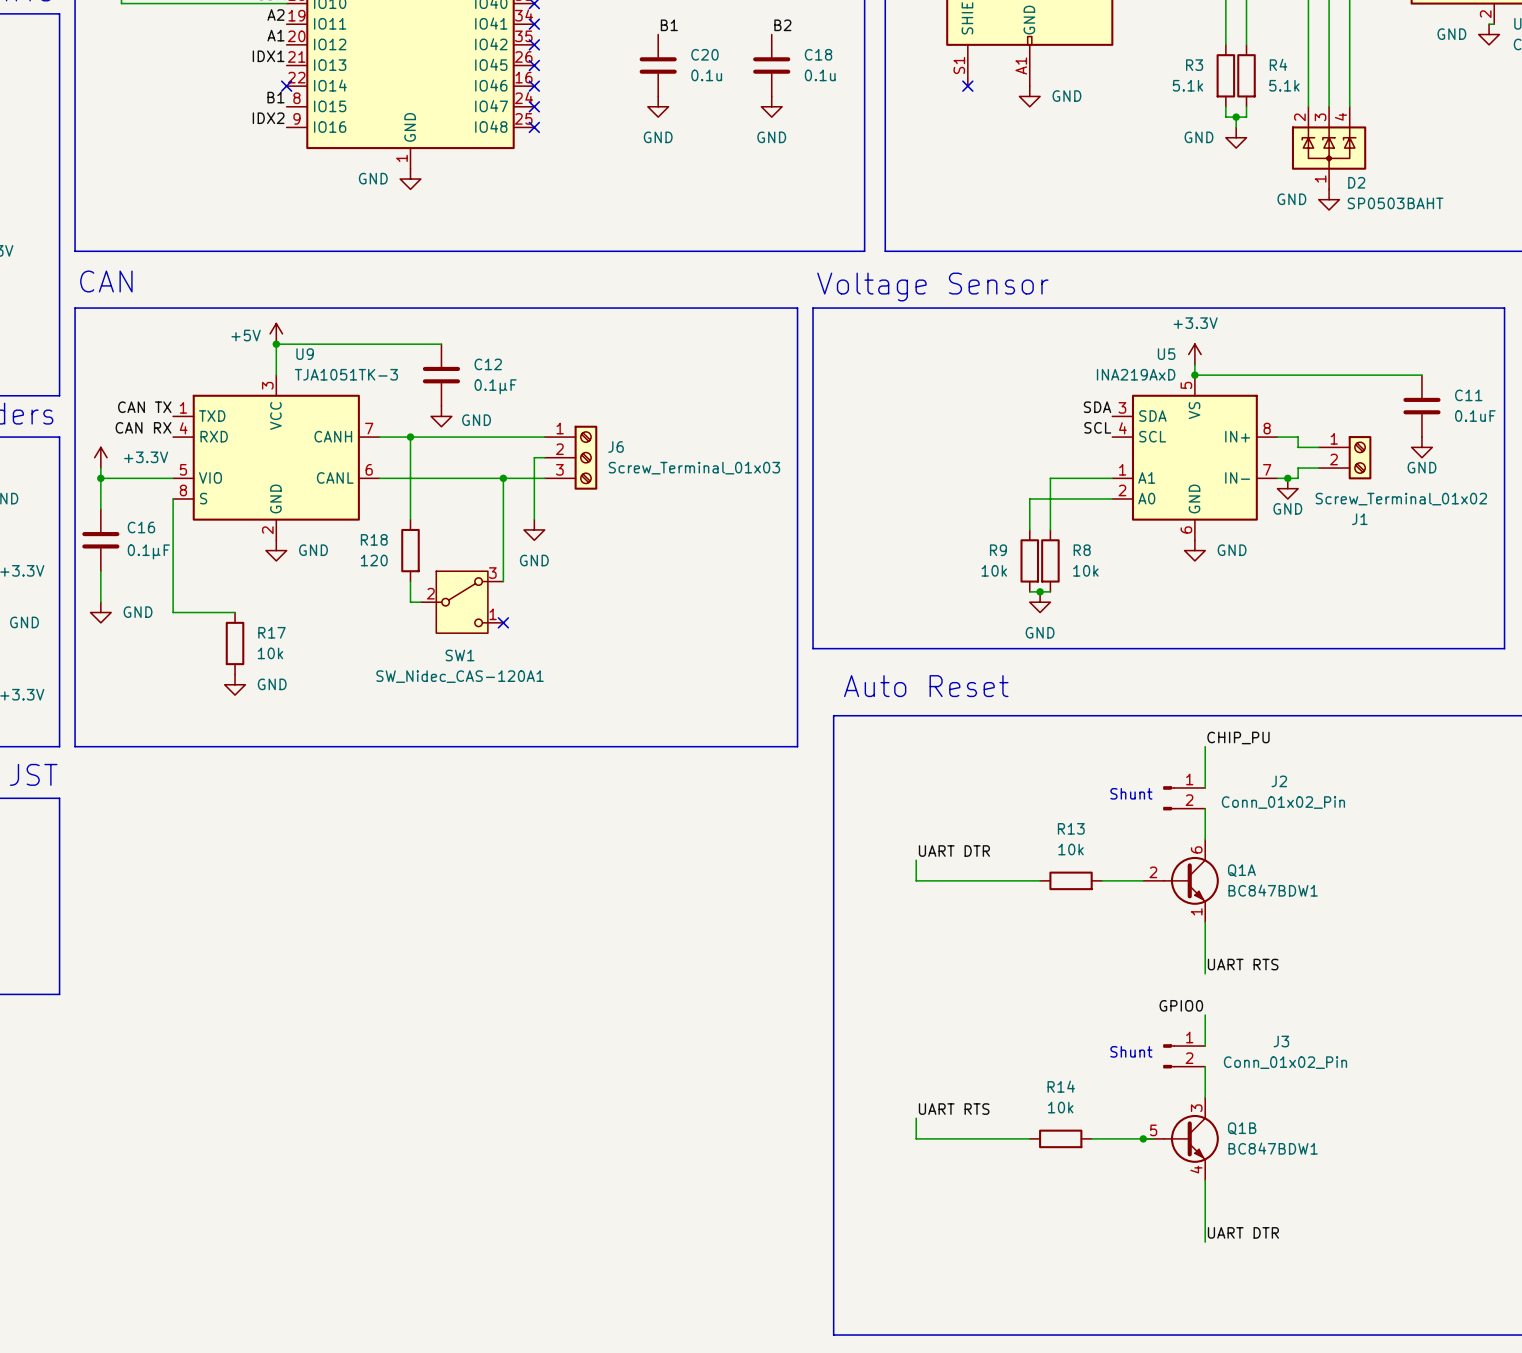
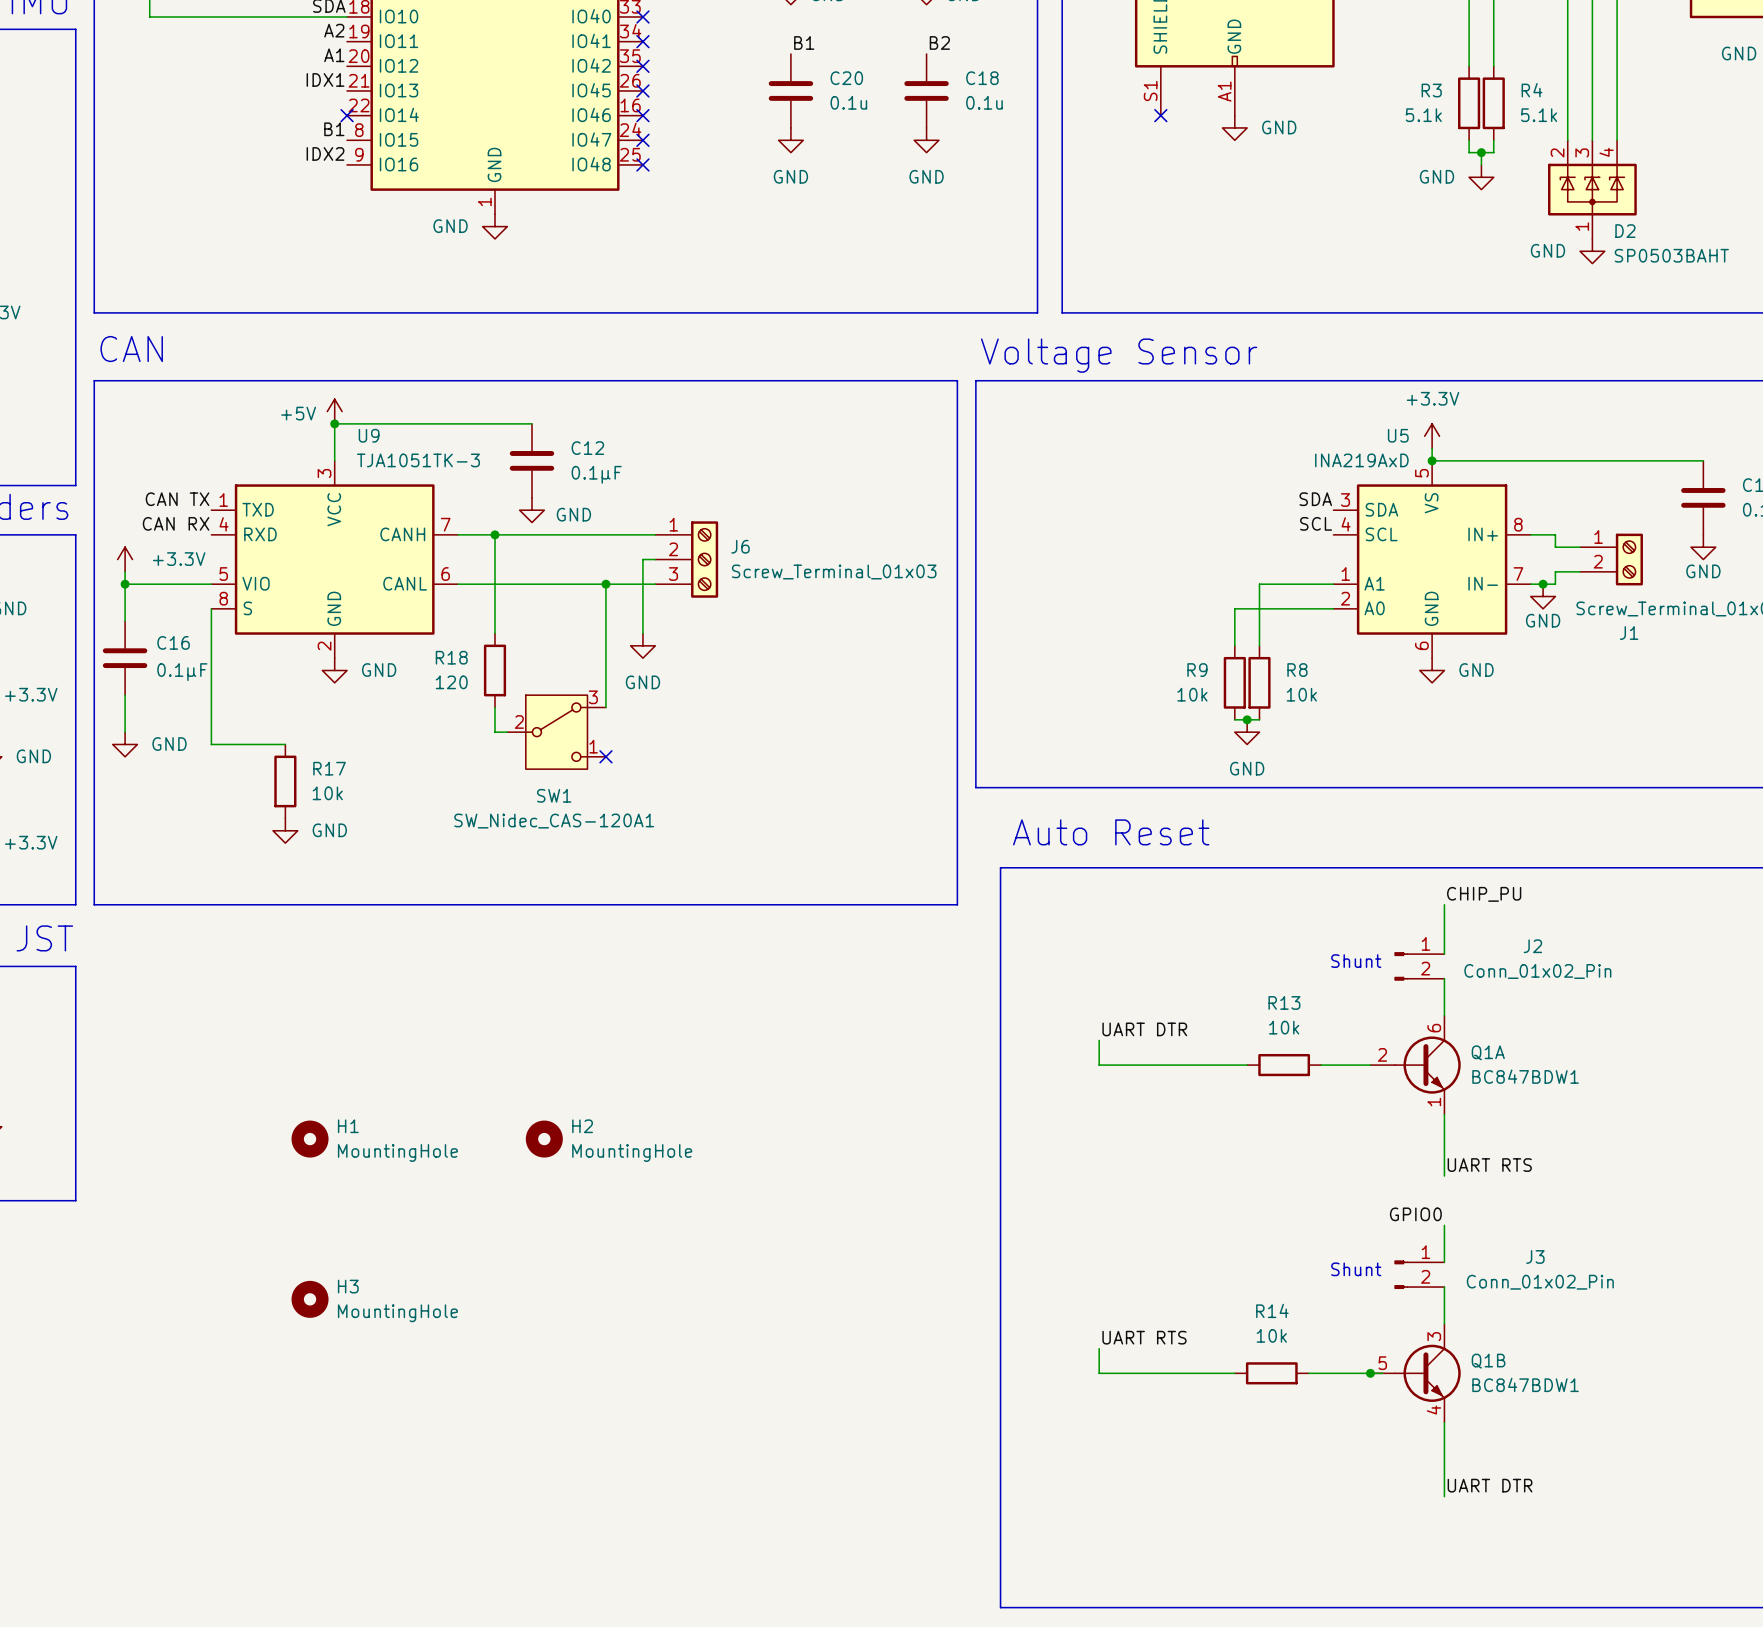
H1: none -> MountingHole (310, 1139)
H2: none -> MountingHole (544, 1139)
H3: none -> MountingHole (310, 1299)

